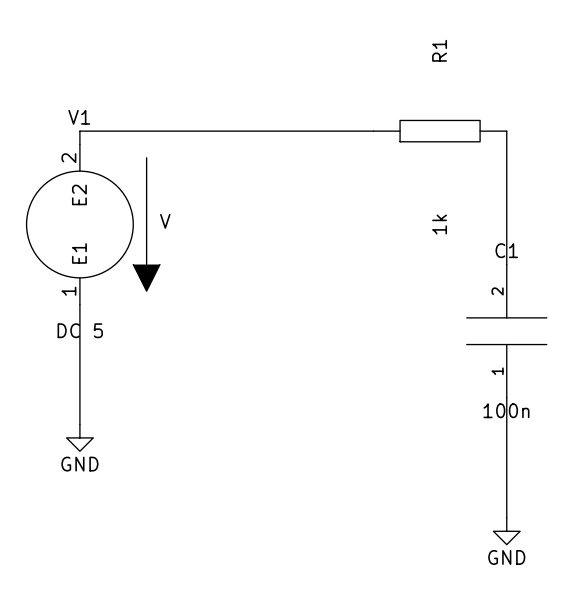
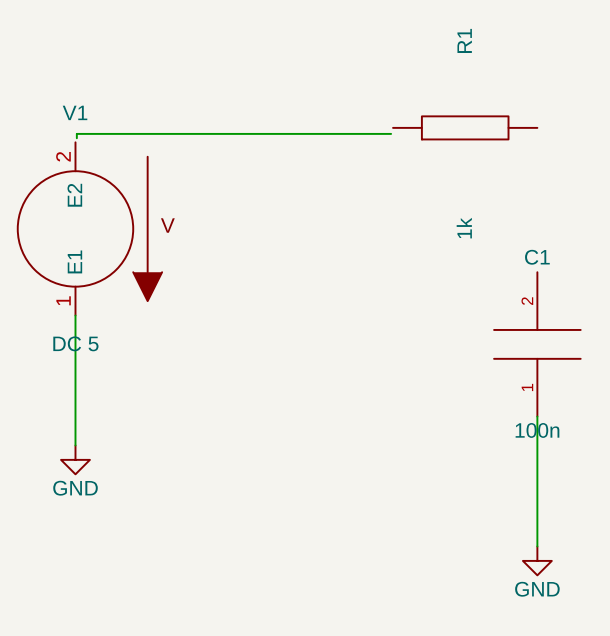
wire: (373, 131) (79, 131) (79, 144) -> none
wire: (506, 131) (506, 264) -> none
wire: none -> (391, 133) (76, 133) (76, 138)

